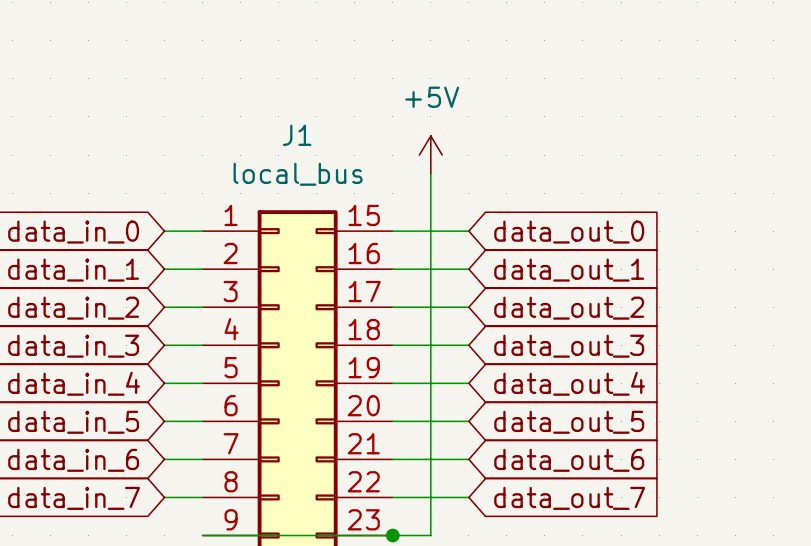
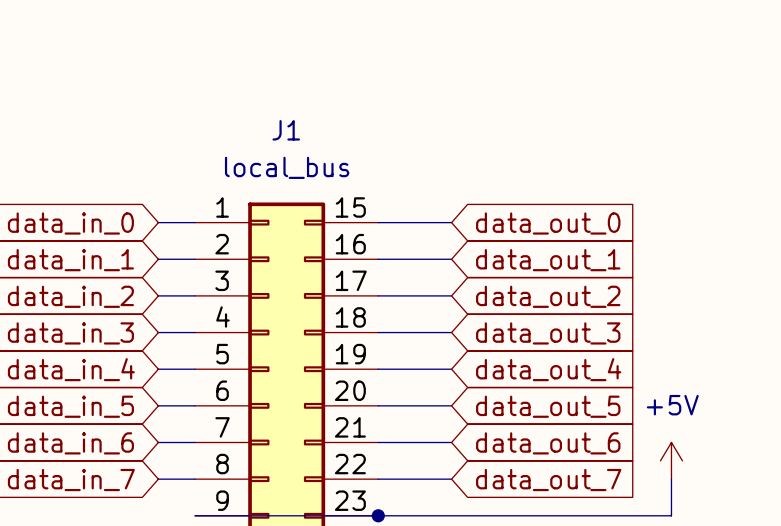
power symbol: +5V (430, 155) -> none
wire: (430, 174) (430, 535) -> (671, 479) (671, 515) (414, 515)
power symbol: none -> +5V (671, 460)

